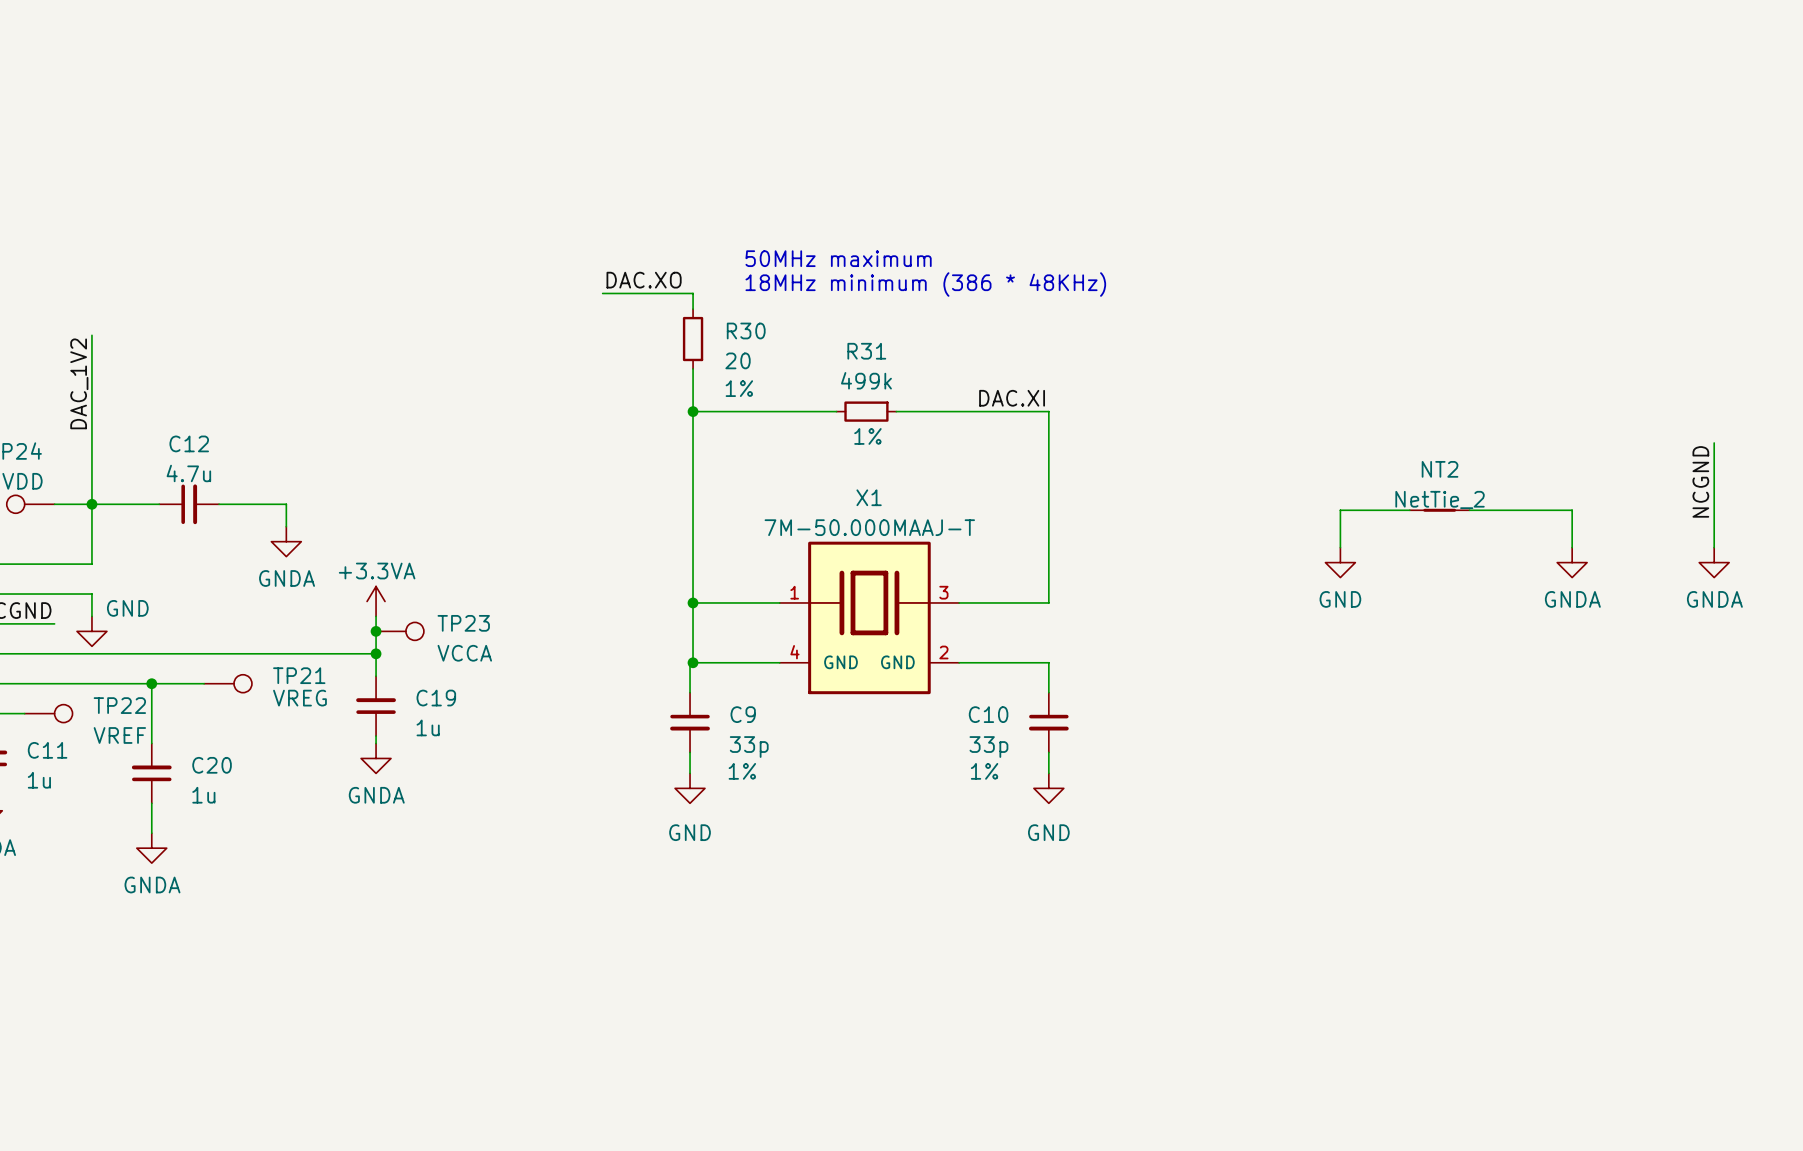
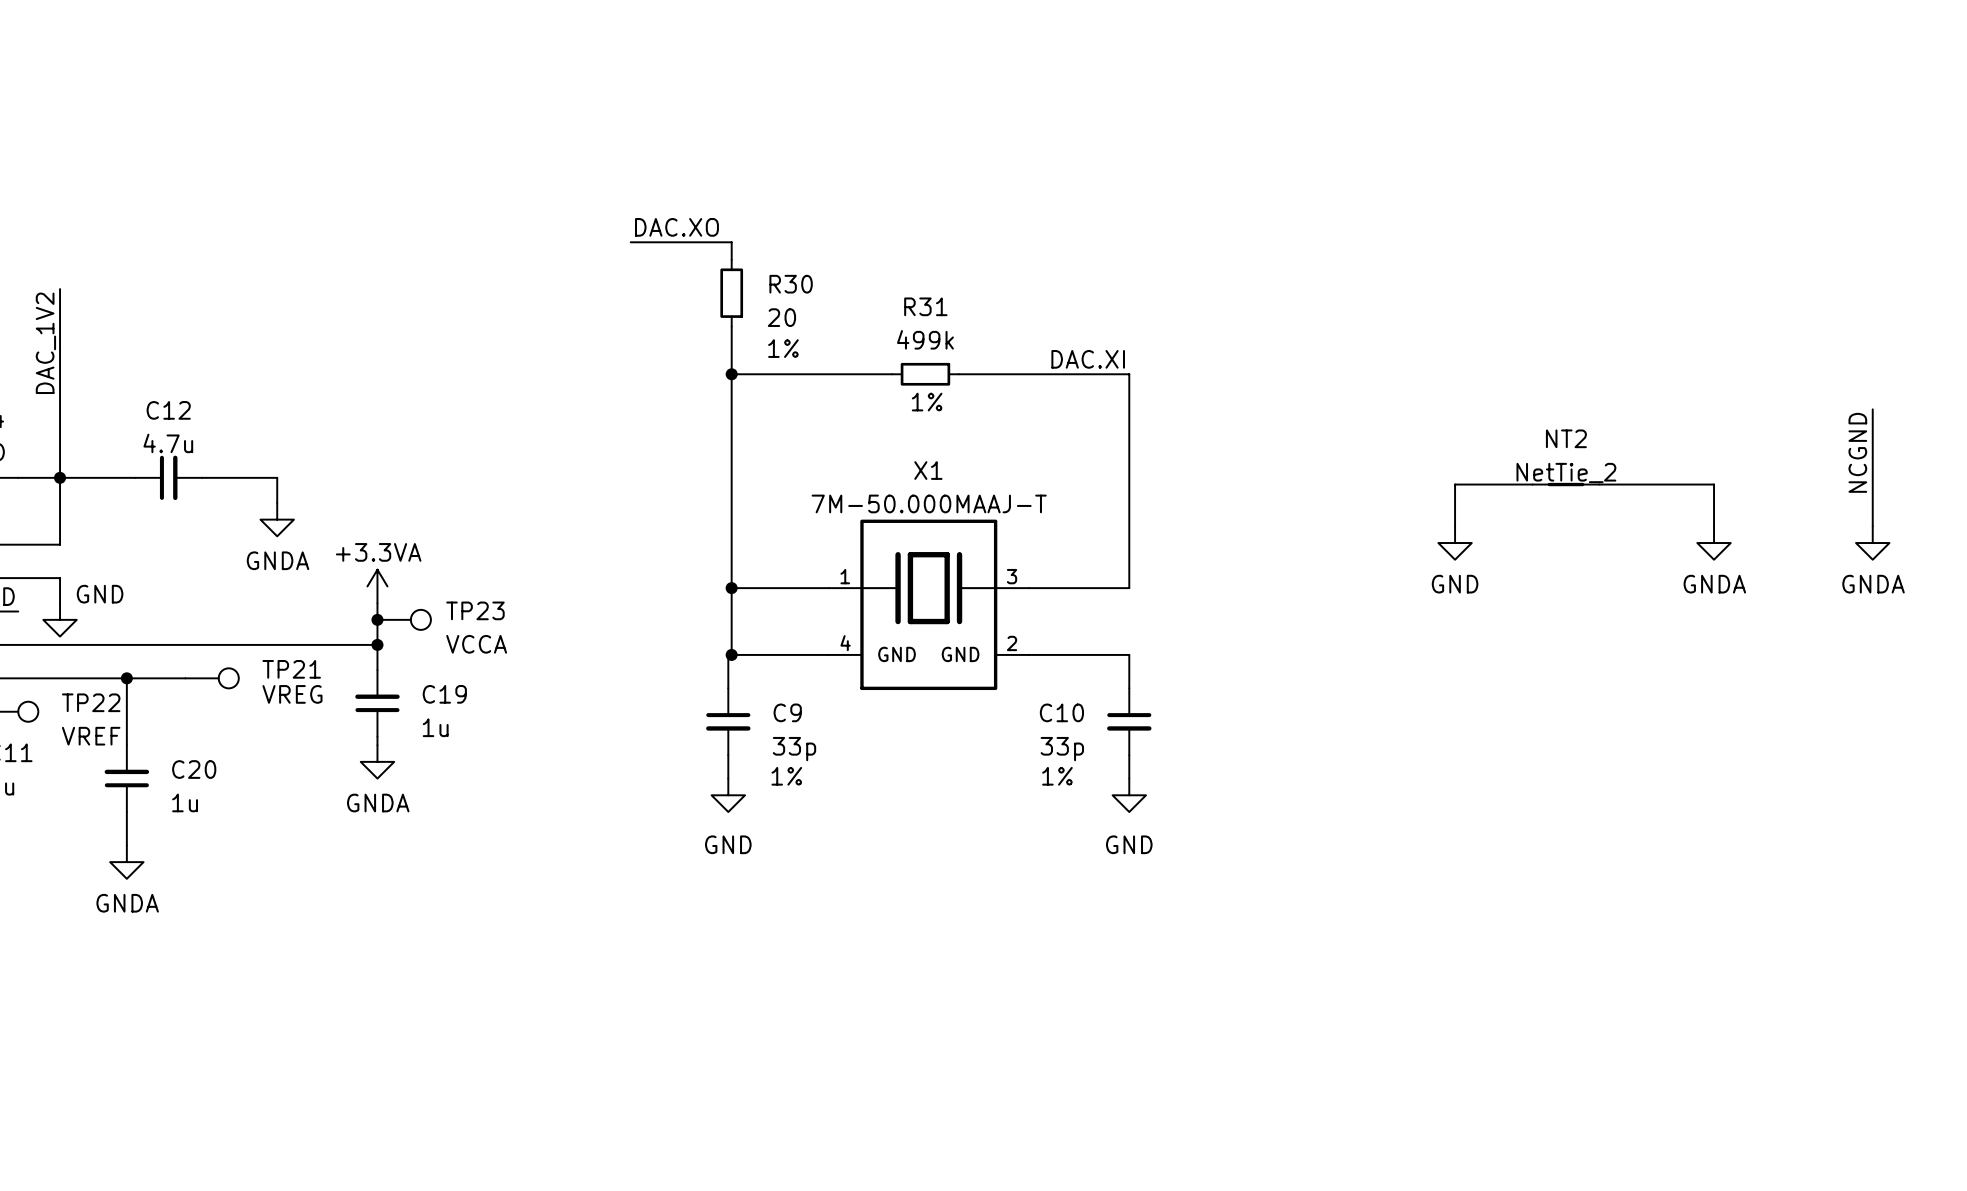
text: 50MHz maximum (838, 258) -> none
text: 18MHz minimum (386 * 48KHz) (925, 284) -> none

